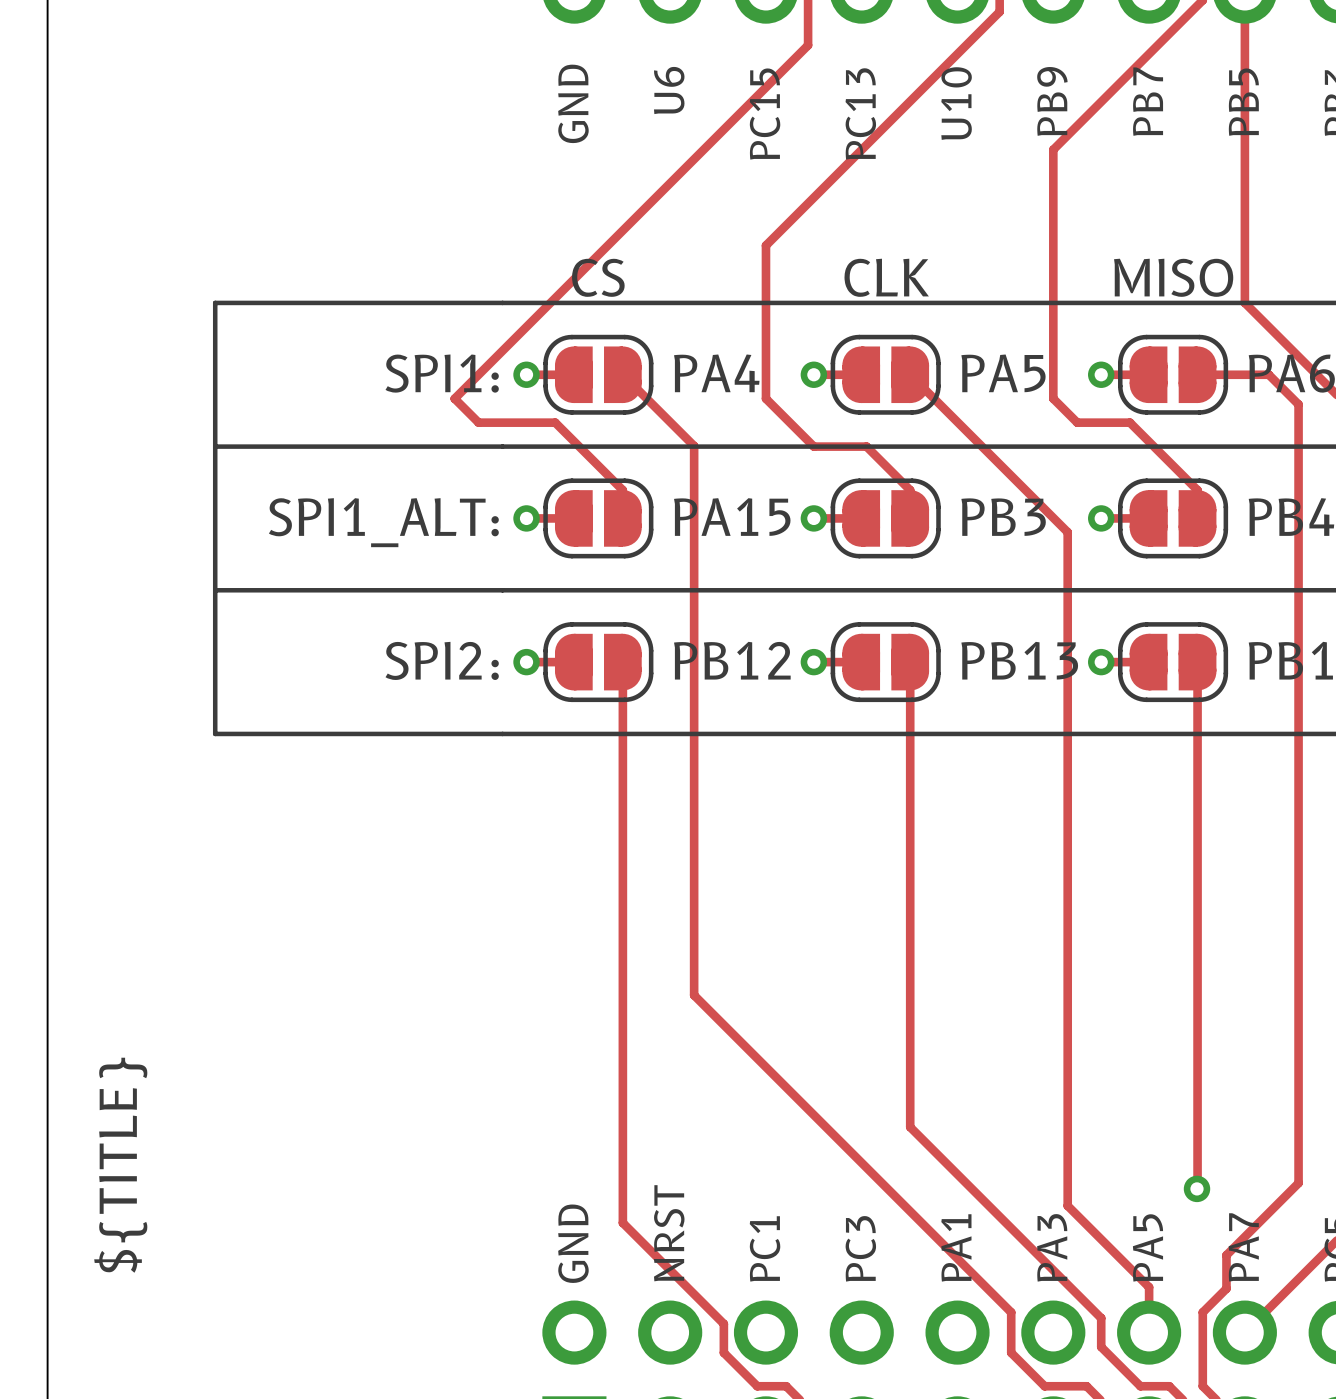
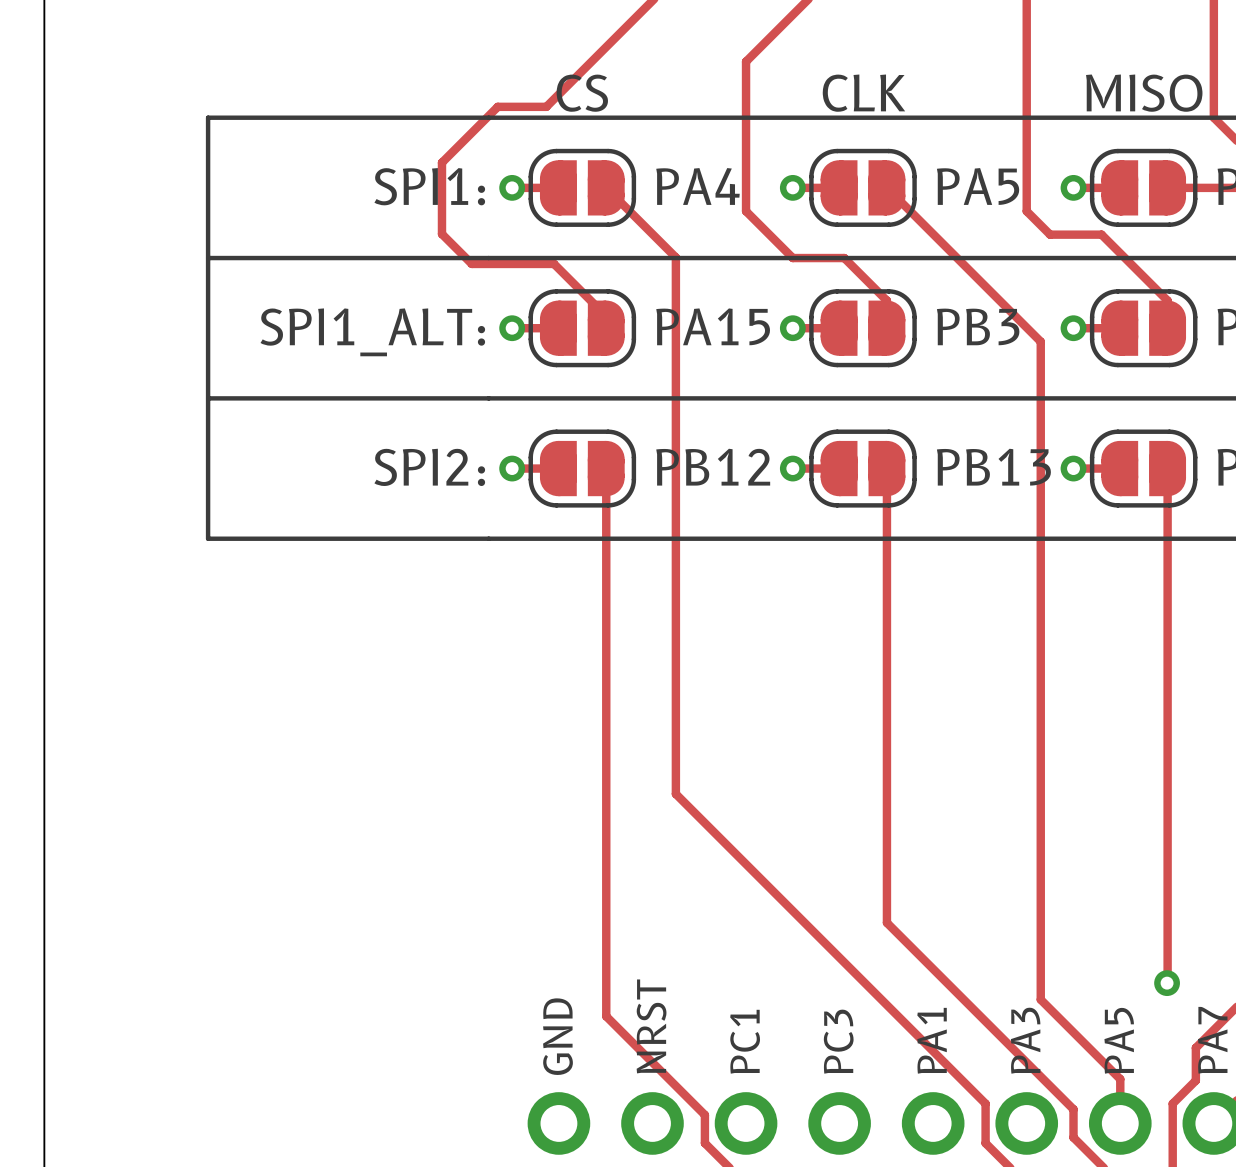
track: (561, 291) (454, 398) (478, 422) (555, 422) (622, 490) (622, 506) -> (546, 106) (497, 106) (441, 162) (441, 234) (471, 263) (554, 263) (606, 316)
text: ${TITLE} (120, 1165) -> none

